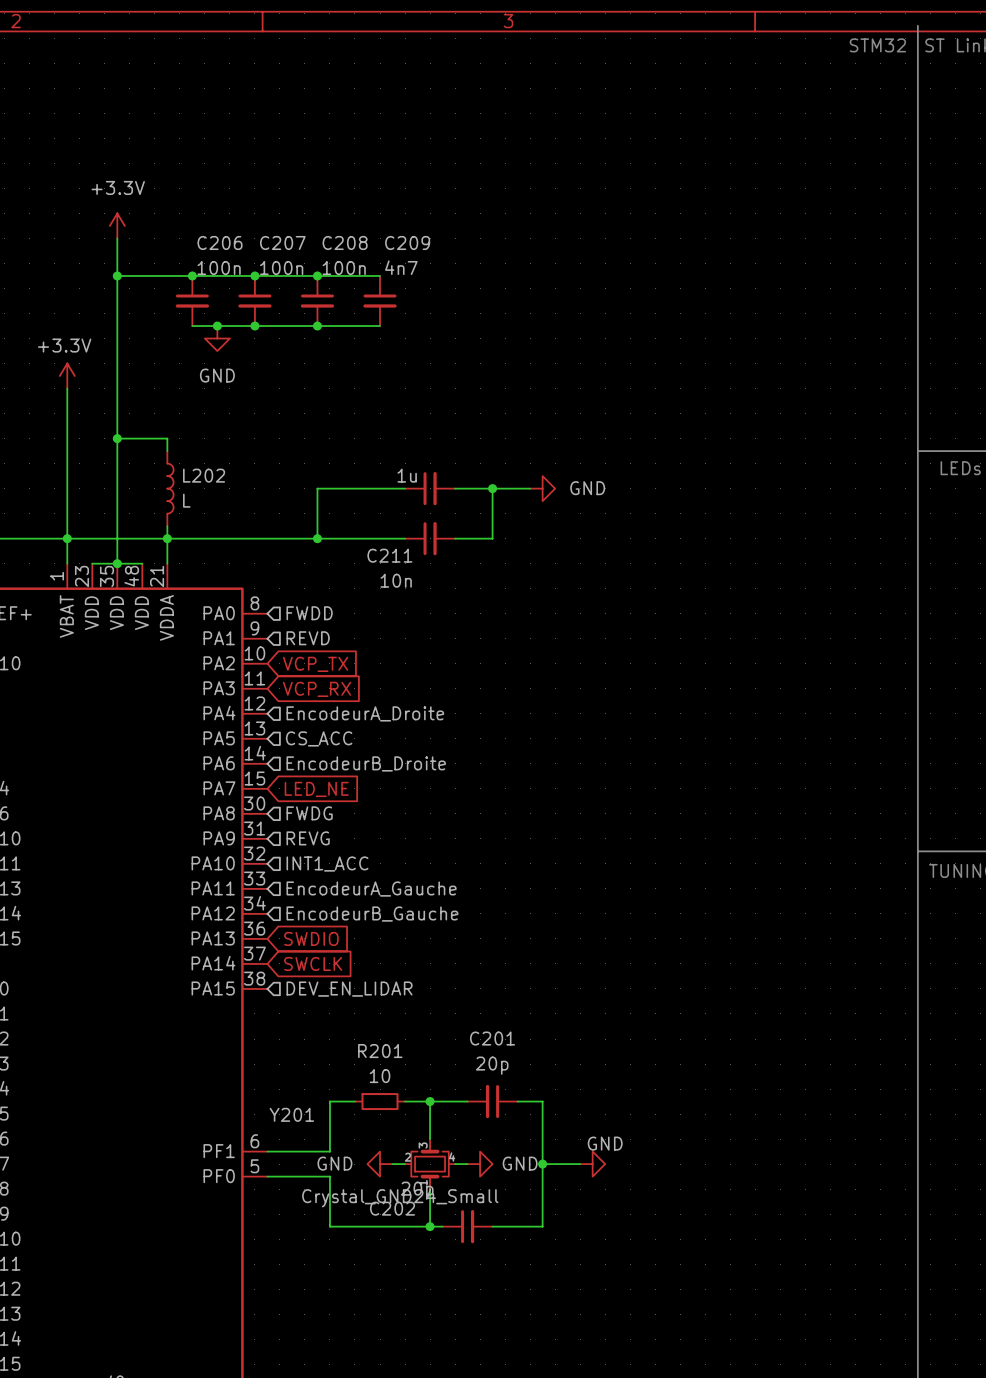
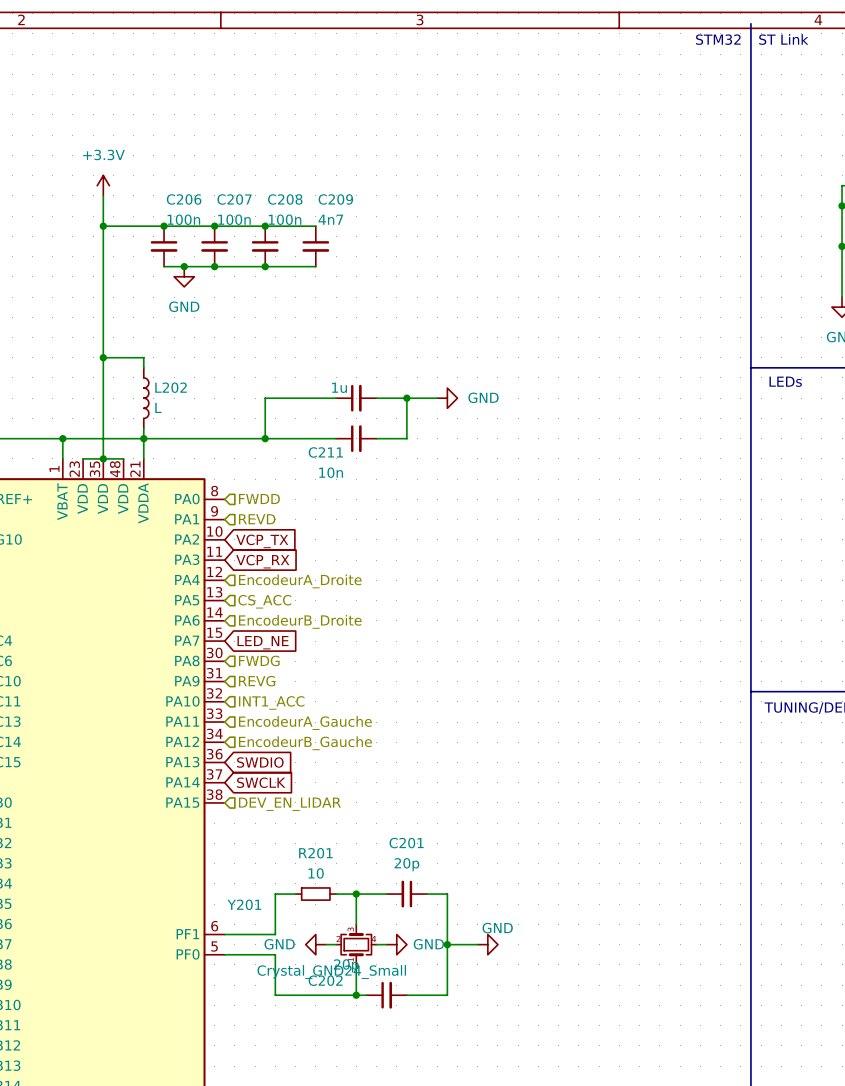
power symbol: +3.3V (67, 376) -> none
wire: (67, 388) (67, 538) -> none

